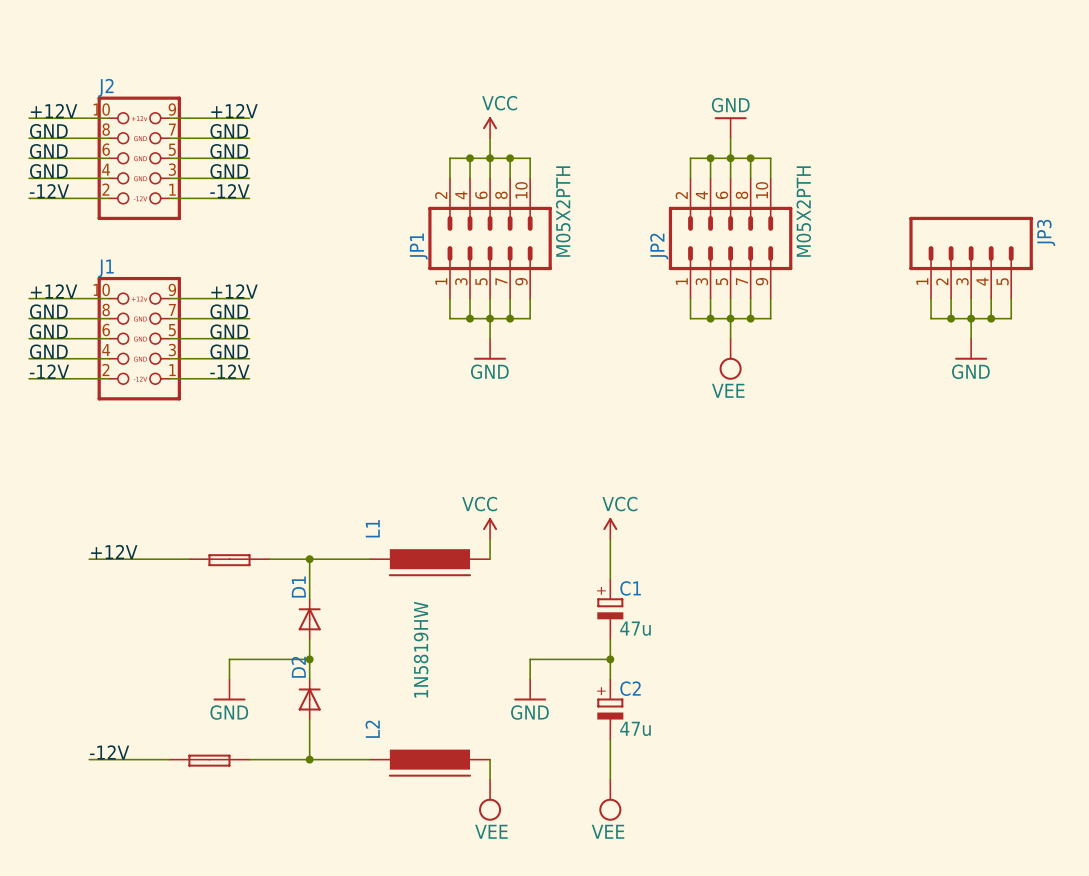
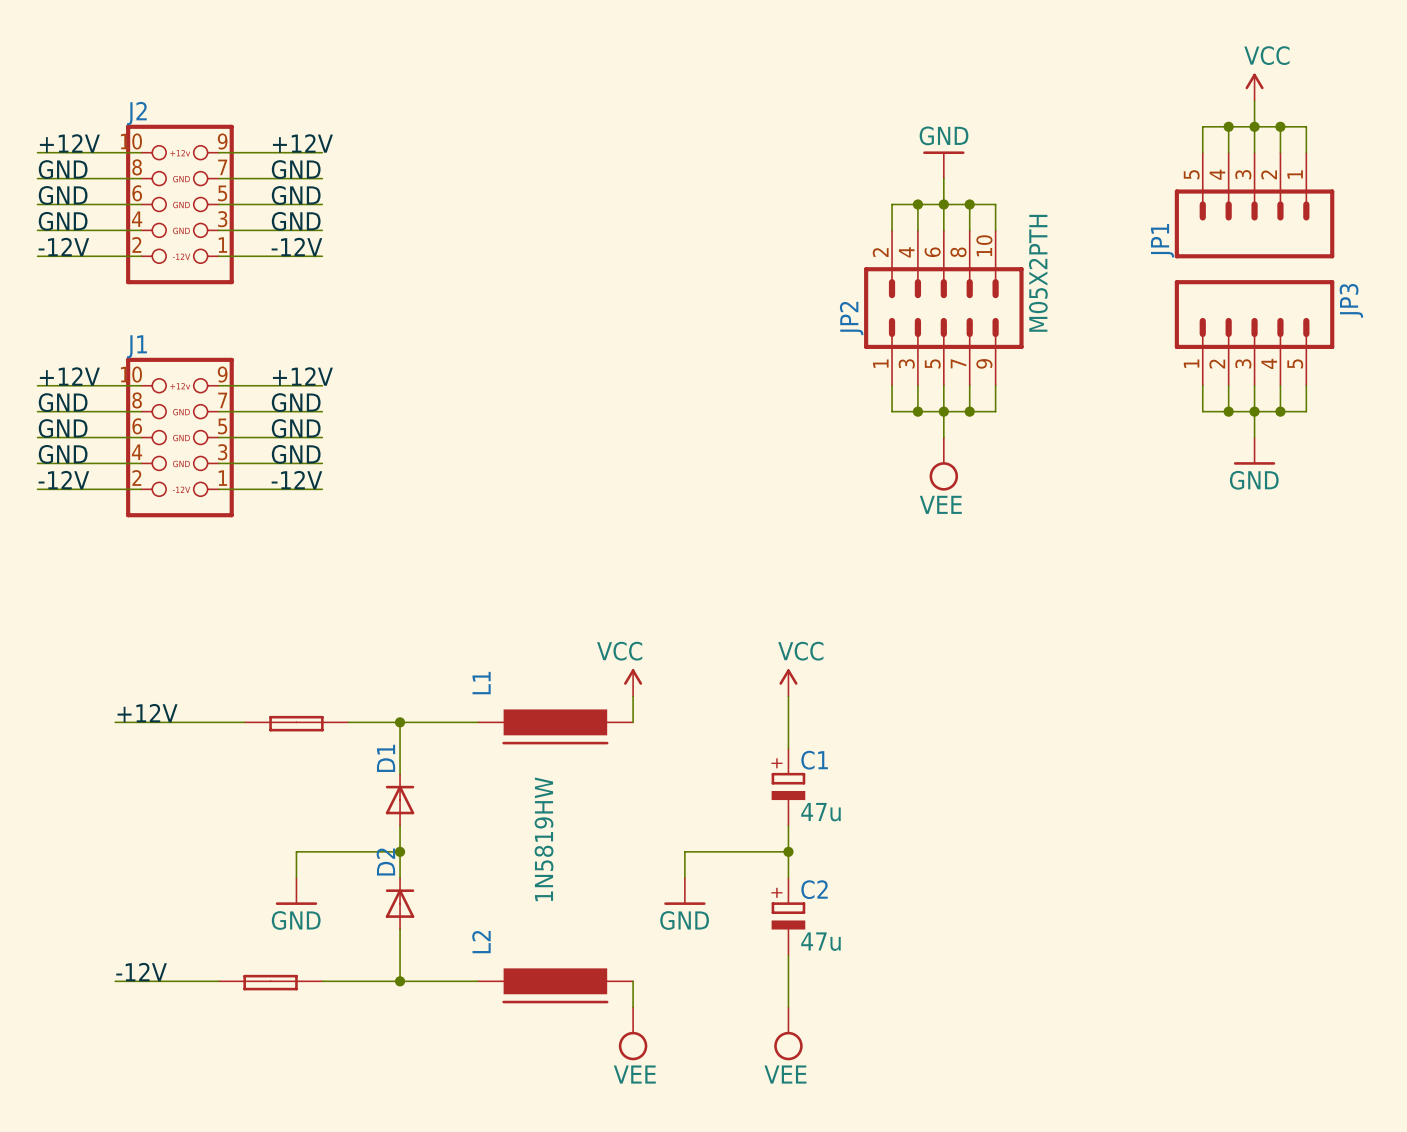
power symbol: none -> VCC (1254, 87)
wire: none -> (1254, 100) (1254, 152)
wire: none -> (1228, 126) (1228, 152)
junction: none -> (1228, 126)
junction: none -> (1254, 126)
wire: none -> (1280, 126) (1280, 152)
junction: none -> (1280, 126)
wire: none -> (1202, 152) (1202, 126) (1306, 126) (1306, 152)
power symbol: VCC (490, 127) -> none
wire: (490, 138) (490, 178) -> none
wire: (470, 158) (470, 178) -> none
junction: (470, 158) -> none
junction: (490, 158) -> none
wire: (510, 158) (510, 178) -> none
junction: (510, 158) -> none
JP1 symbol: [428, 178, 552, 299] -> [1174, 152, 1335, 259]
wire: (449, 178) (449, 158) (530, 158) (530, 178) -> none
JP1 value: M05X2PTH (563, 211) -> none
JP1 name position: JP1 (418, 246) -> JP1 (1162, 240)
wire: (449, 298) (449, 318) (530, 318) (530, 298) -> none
wire: (470, 298) (470, 318) -> none
wire: (490, 298) (490, 338) -> none
wire: (510, 298) (510, 318) -> none
junction: (470, 318) -> none
junction: (490, 318) -> none
junction: (510, 318) -> none
power symbol: GND (490, 349) -> none

